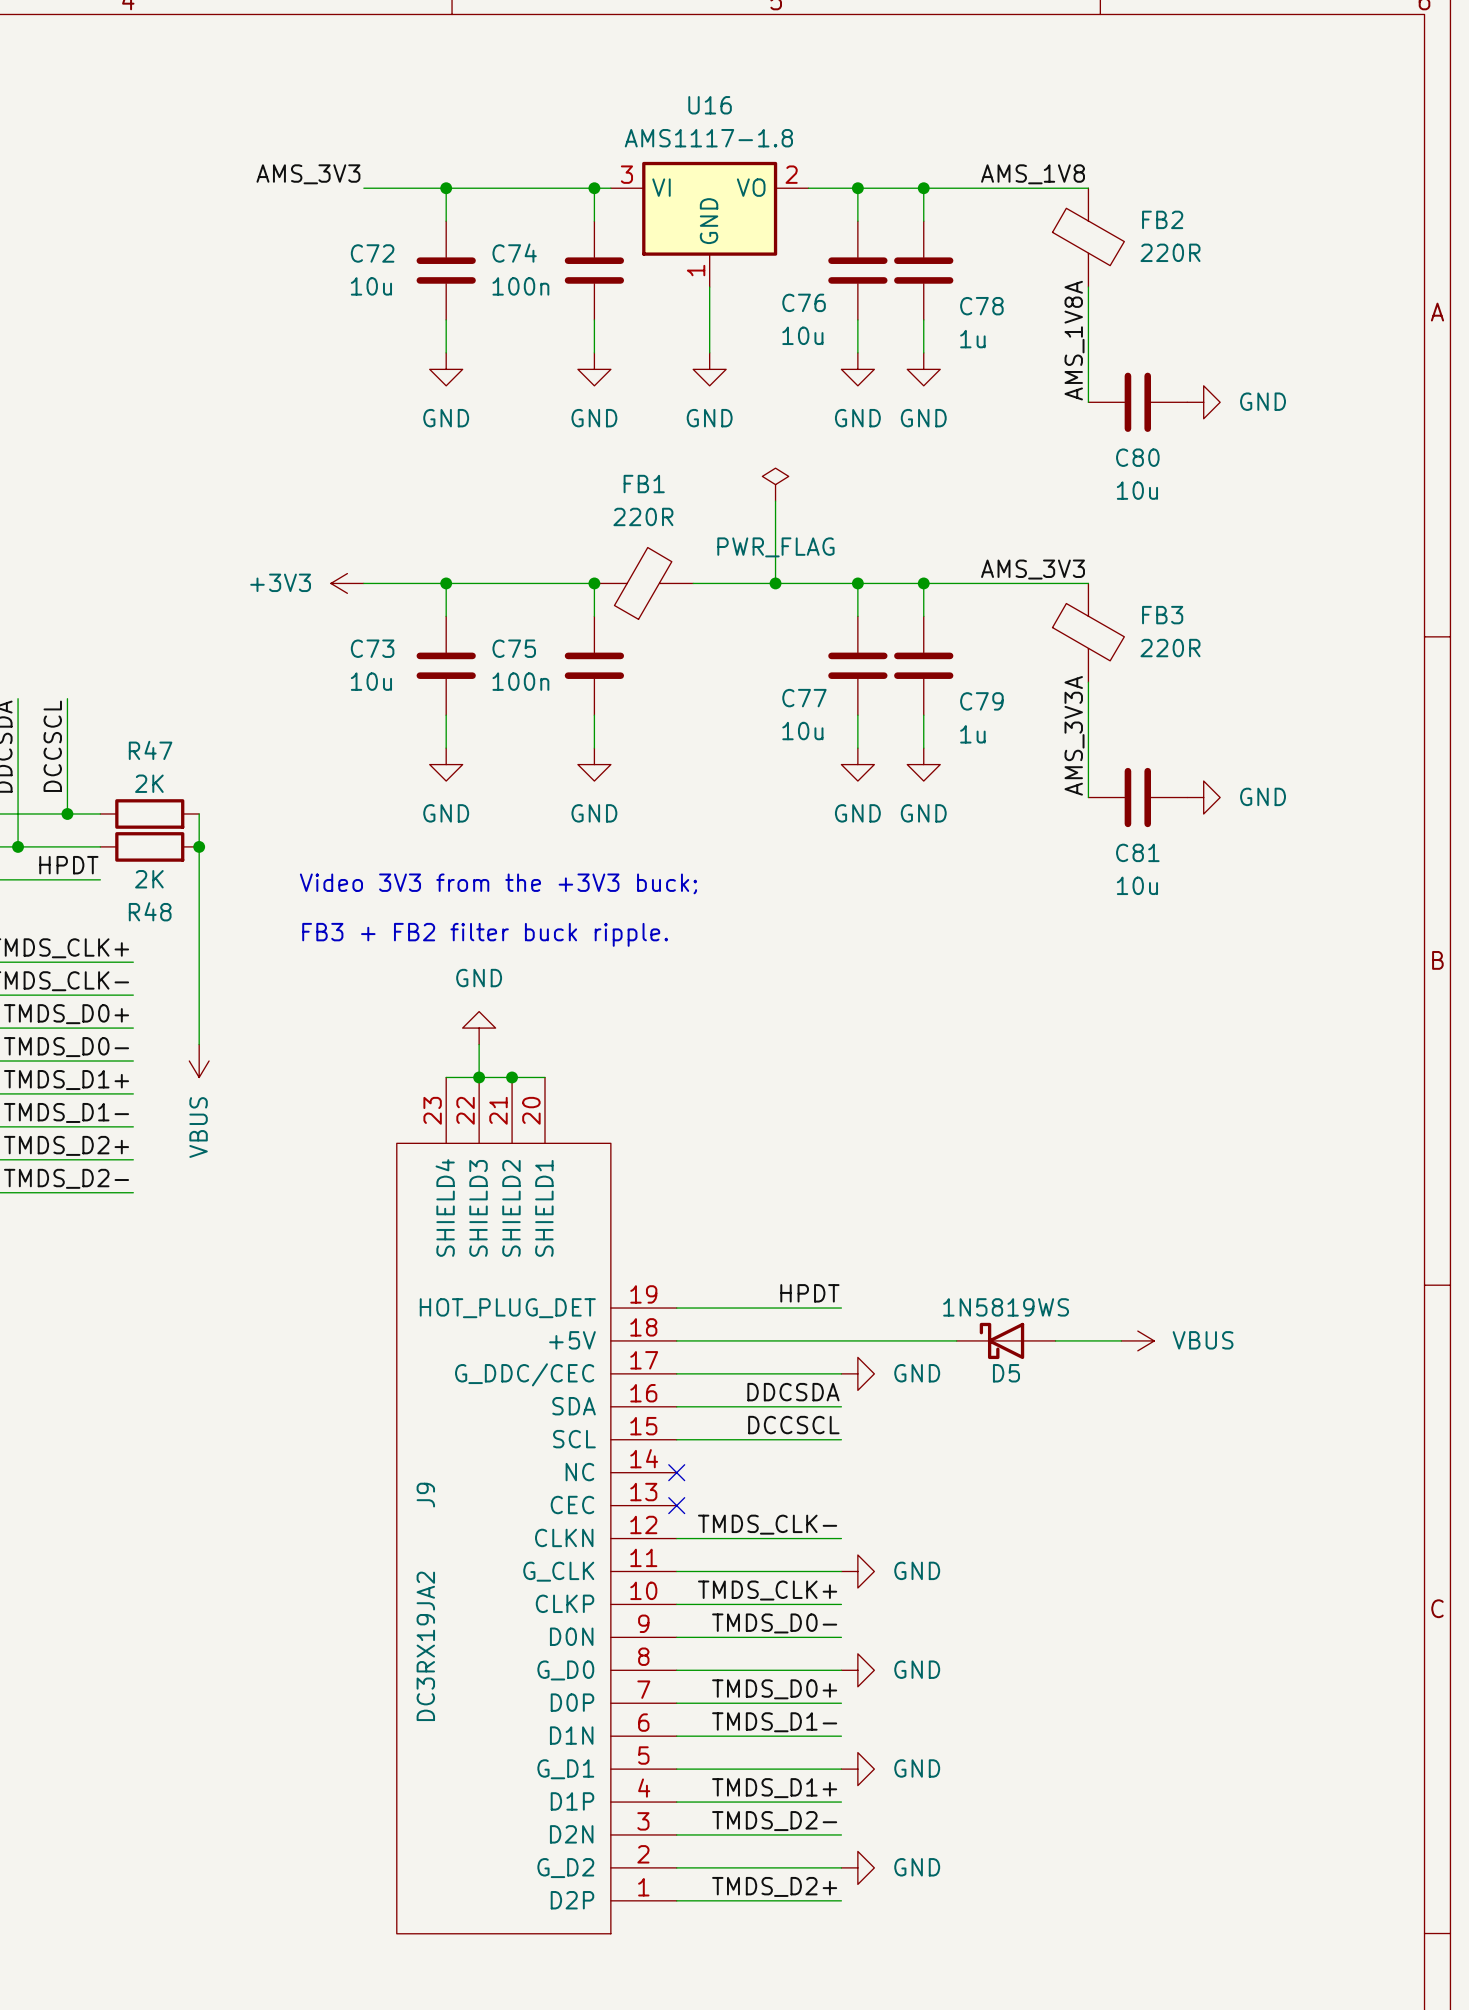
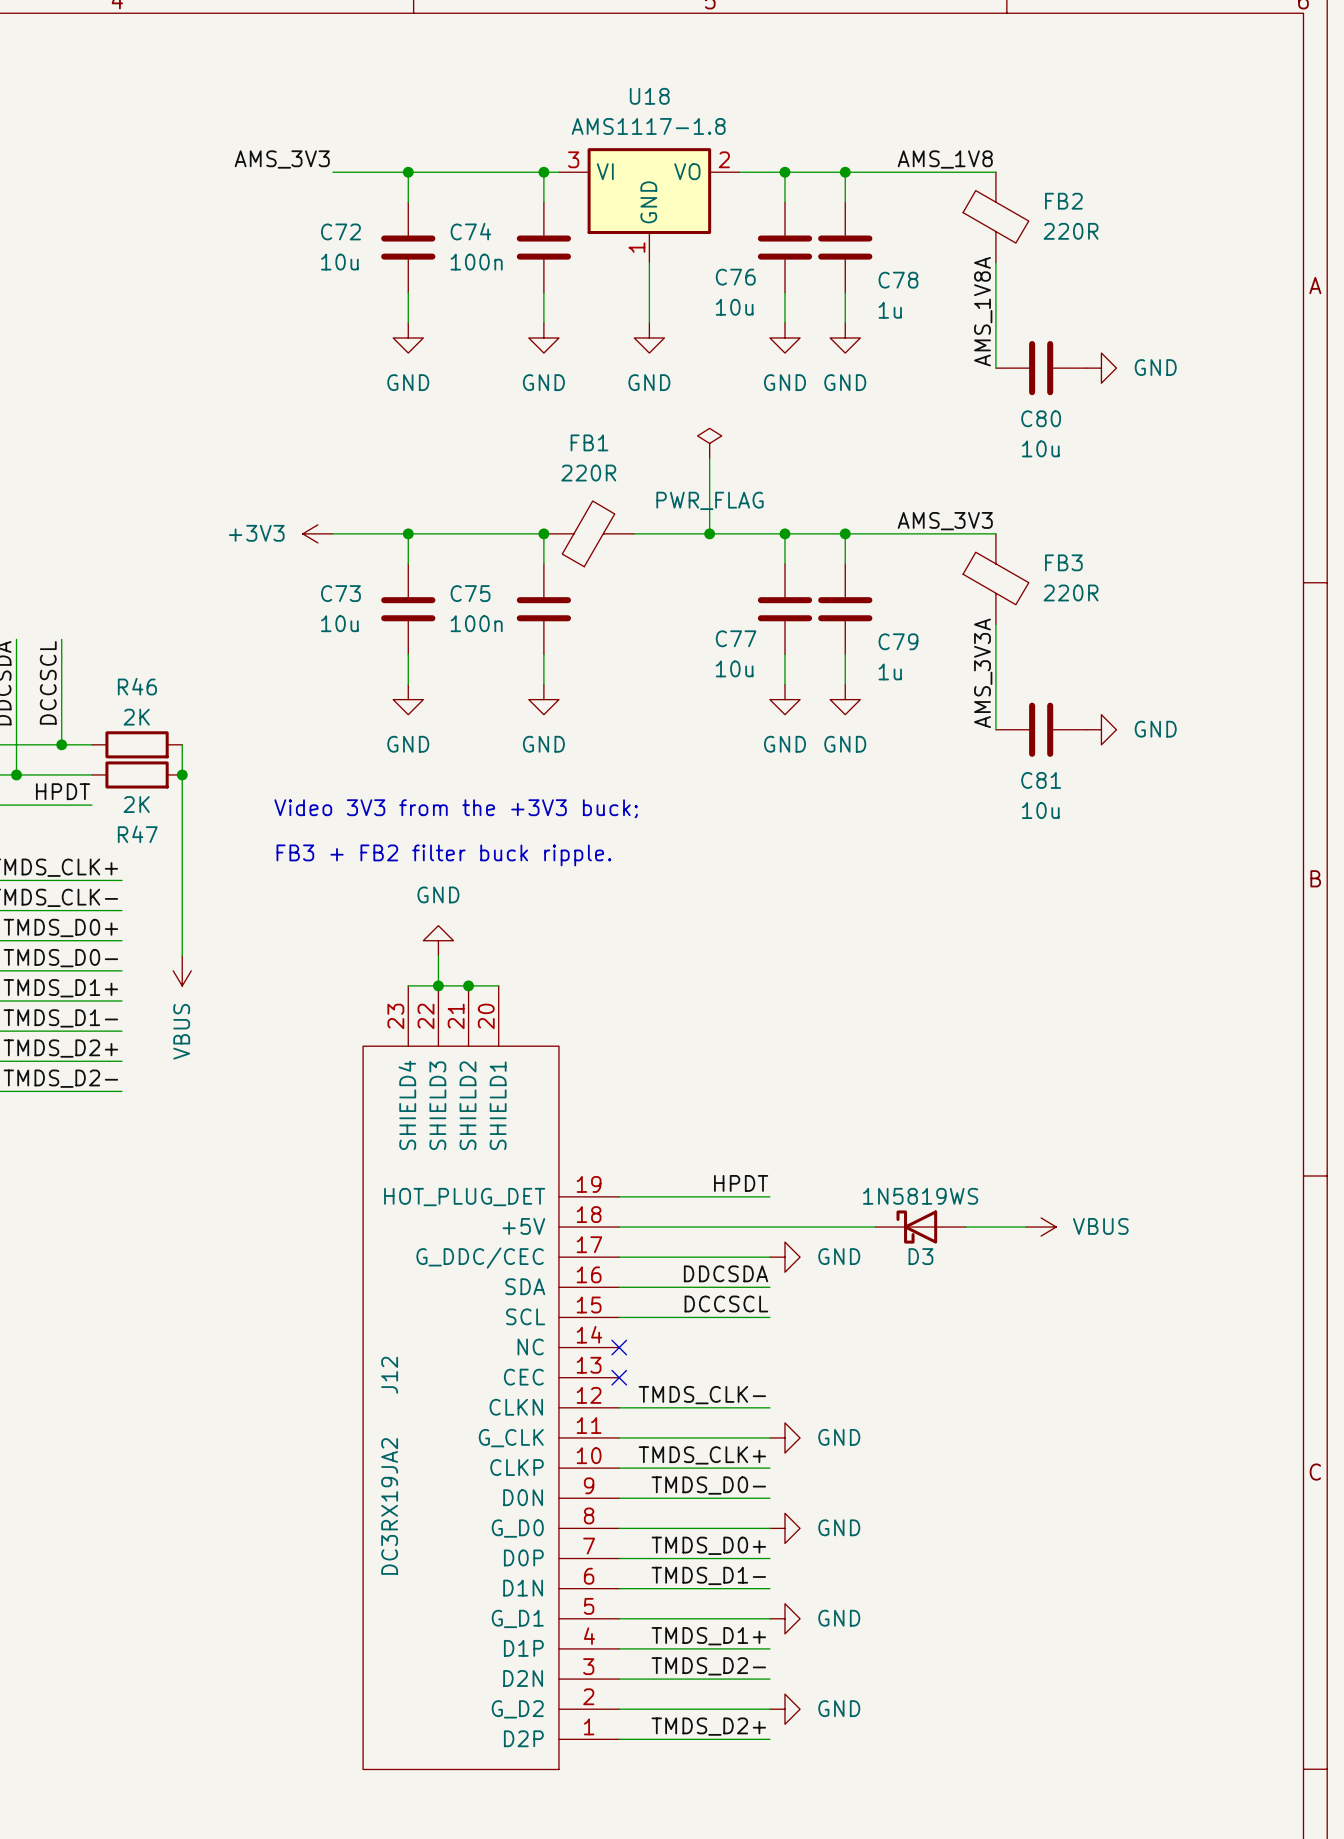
U16 name: U16 (710, 105) -> U18 (649, 96)
R47 name: R47 (150, 750) -> R46 (137, 686)
R48 name: R48 (150, 911) -> R47 (137, 834)
D5 name: D5 (1006, 1373) -> D3 (920, 1256)
J9 name: J9 (425, 1495) -> J12 (389, 1375)

